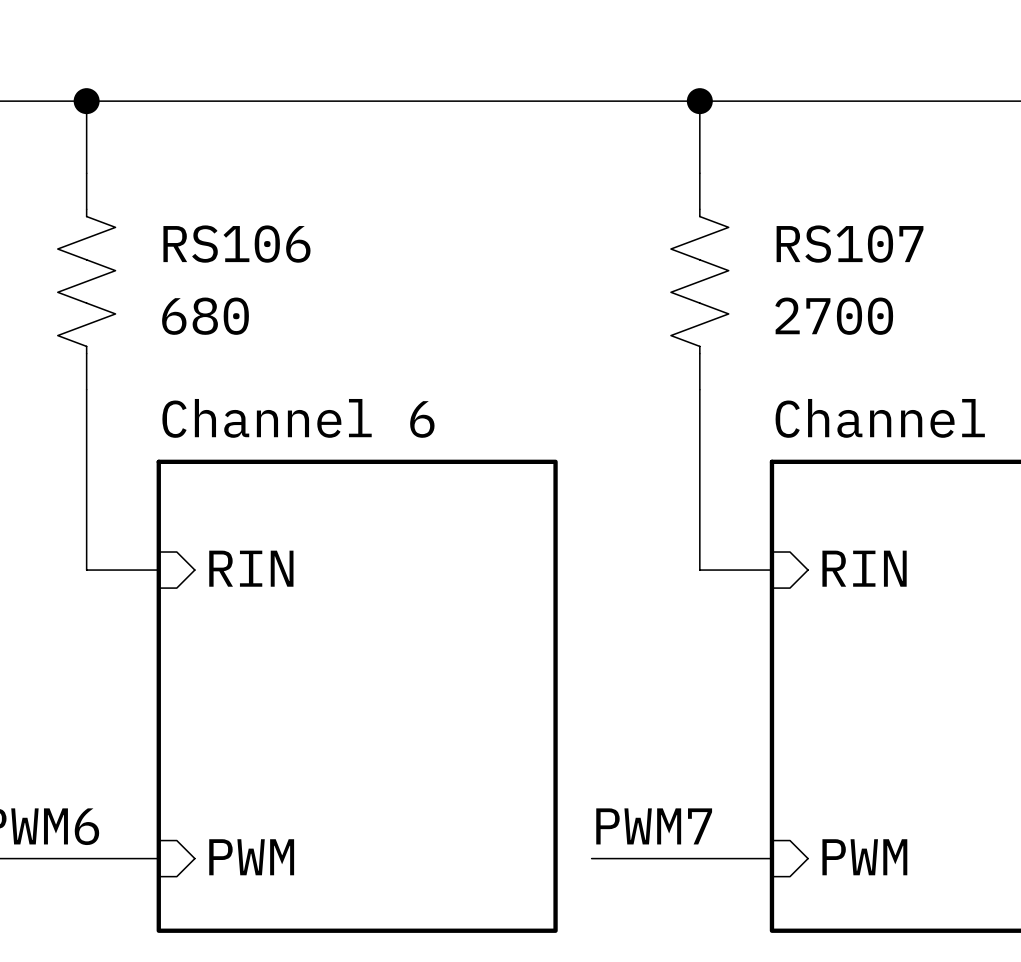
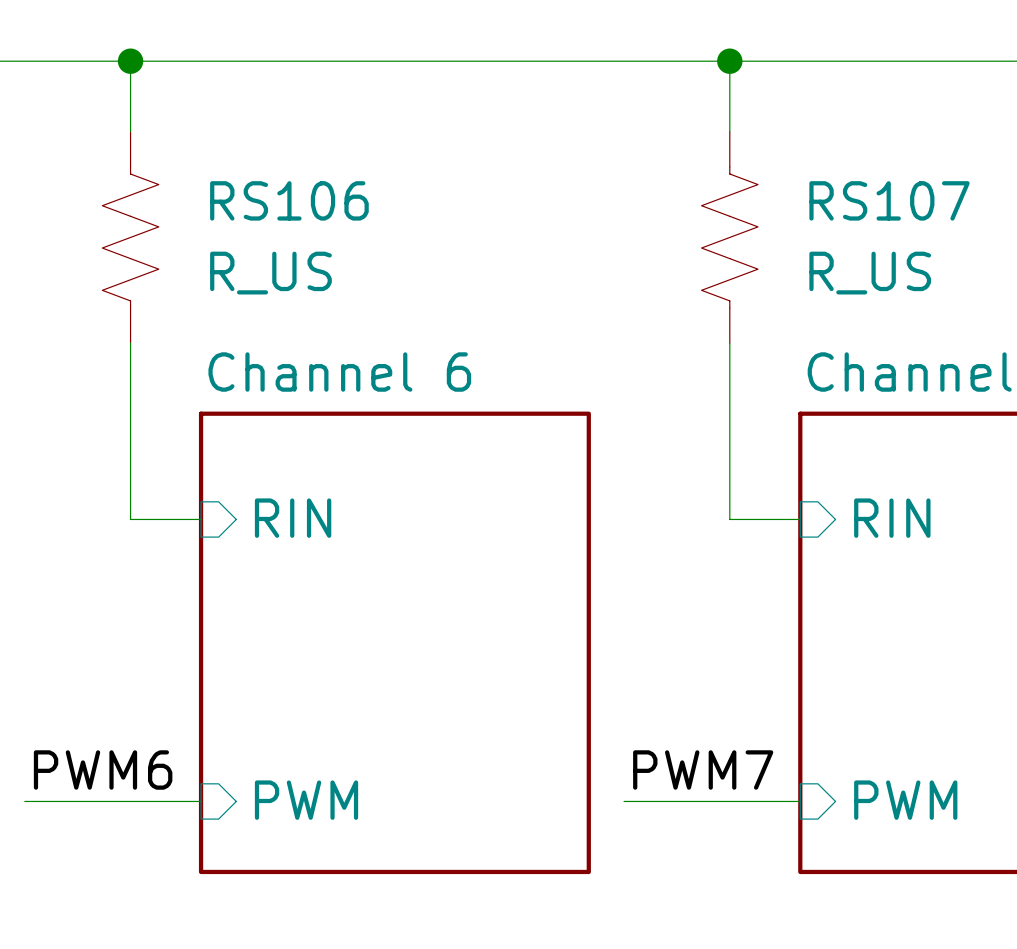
RS106 value: 680 (205, 316) -> R_US (270, 273)
RS107 value: 2700 (834, 316) -> R_US (870, 273)

